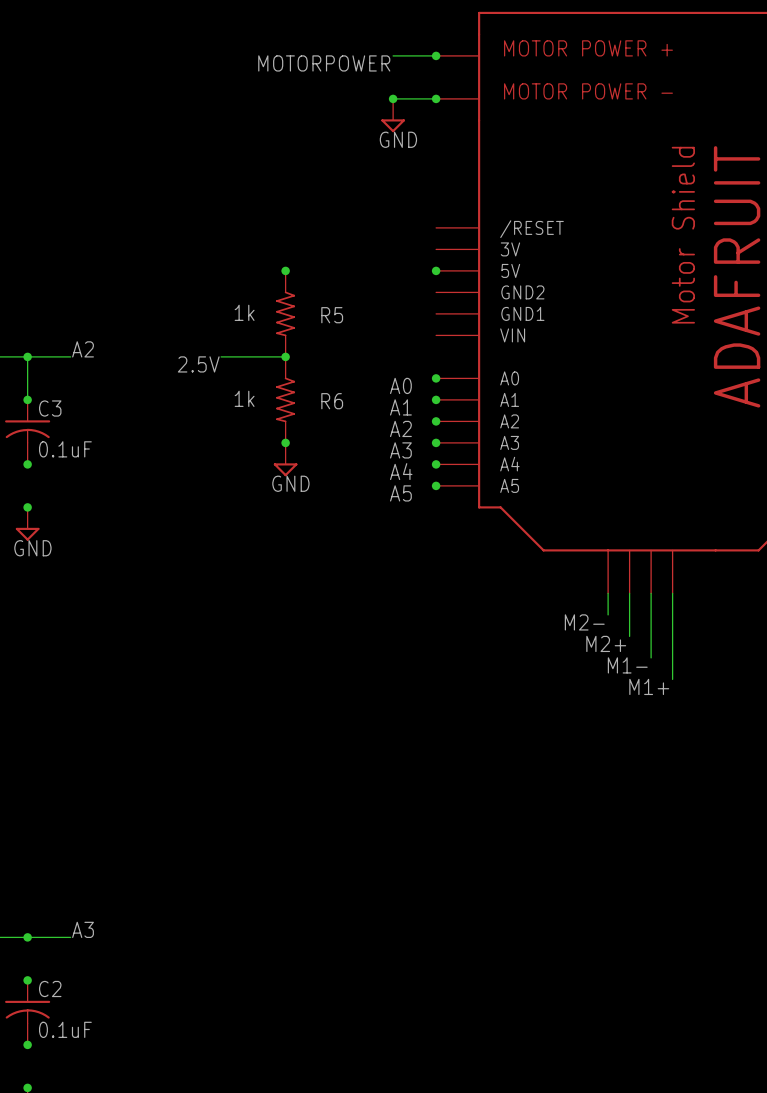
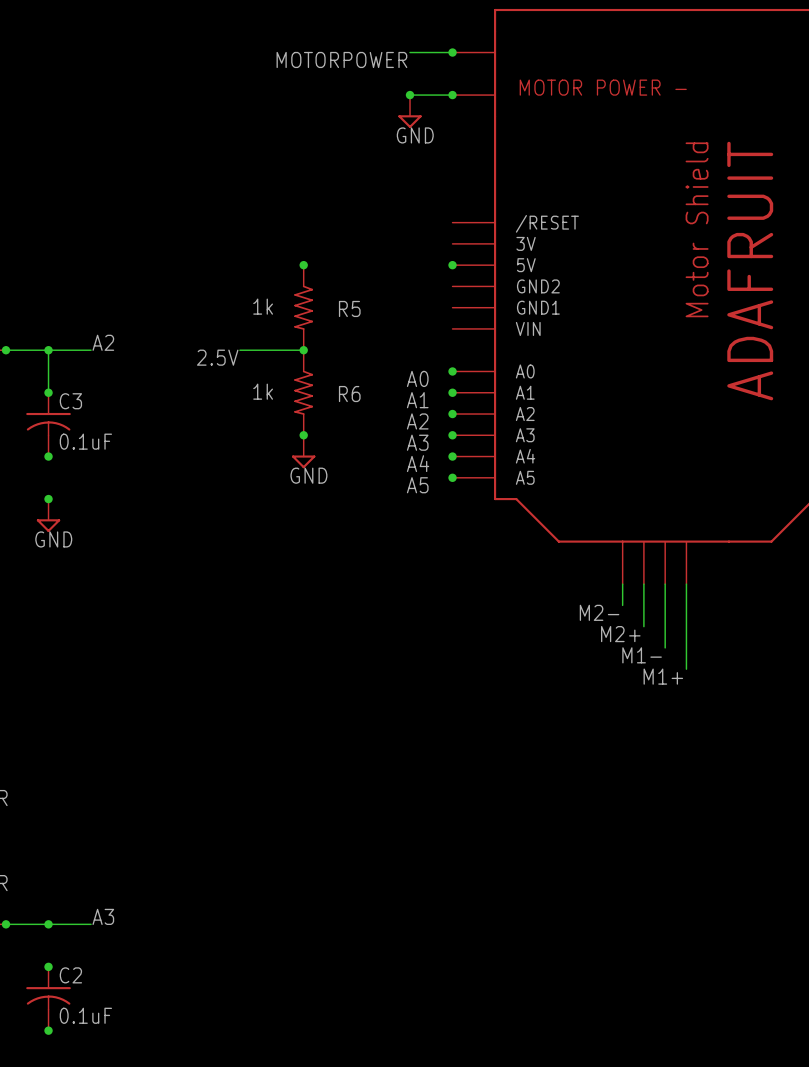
text: MOTOR POWER + (588, 48) -> none

